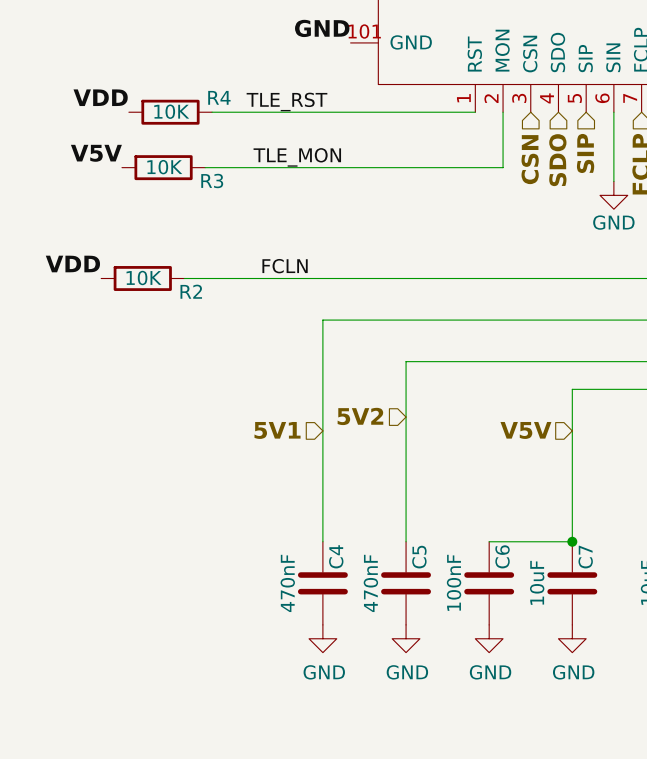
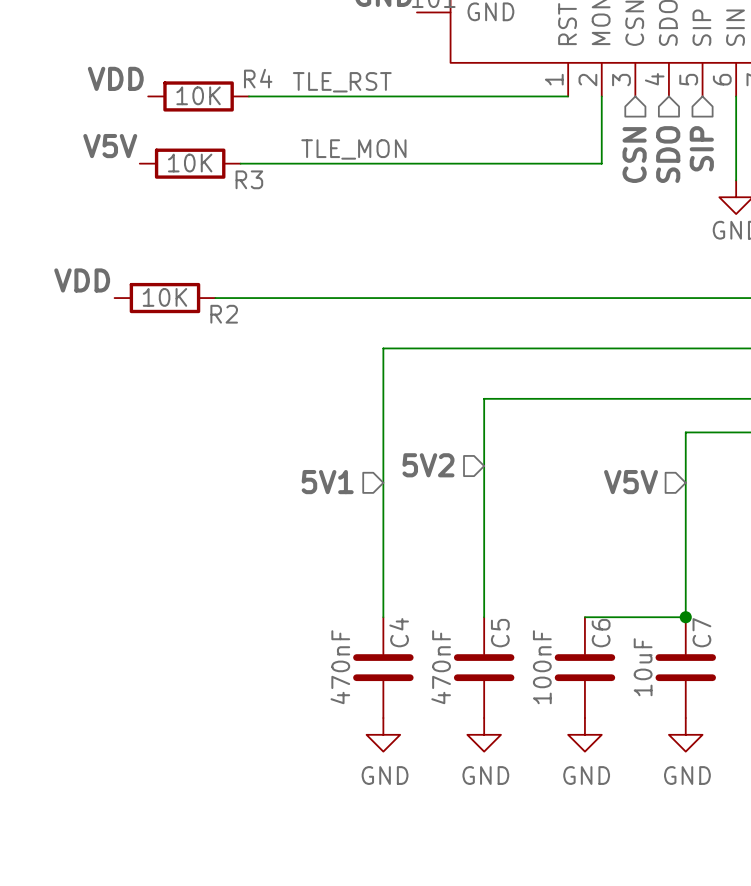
label: FCLN (285, 266) -> none

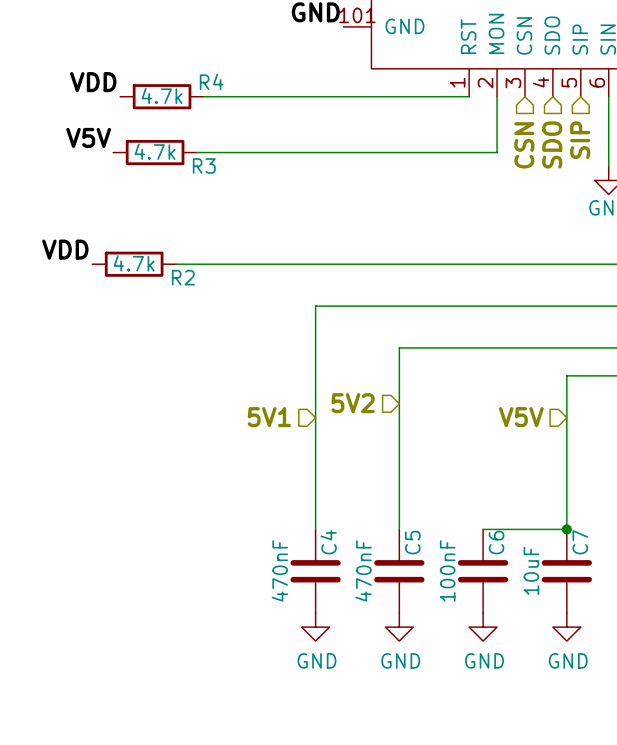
label: TLE_RST (342, 82) -> none
R4 value: 10K (198, 95) -> 4.7k (162, 95)
label: TLE_MON (353, 149) -> none
R3 value: 10K (190, 163) -> 4.7k (155, 151)
R2 value: 10K (164, 297) -> 4.7k (134, 263)

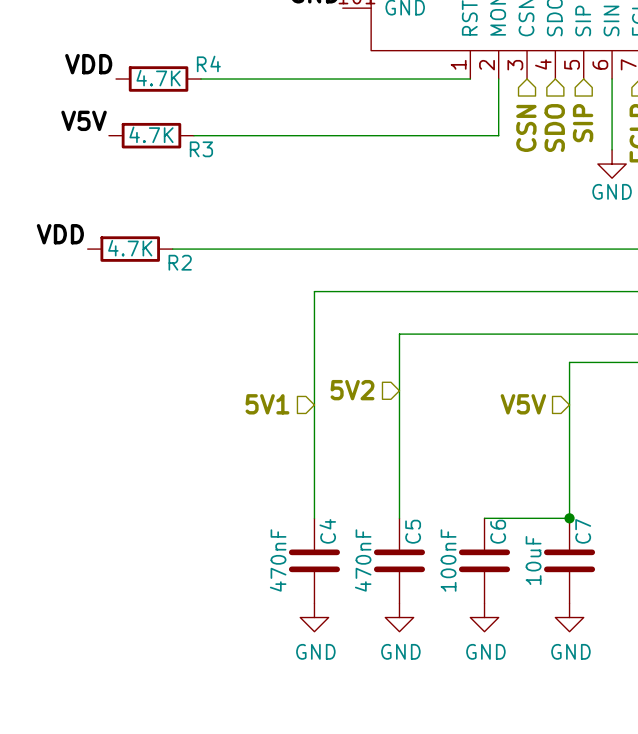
R4 value: 4.7k (162, 95) -> 4.7K (158, 78)
R3 value: 4.7k (155, 151) -> 4.7K (151, 134)
R2 value: 4.7k (134, 263) -> 4.7K (130, 248)

